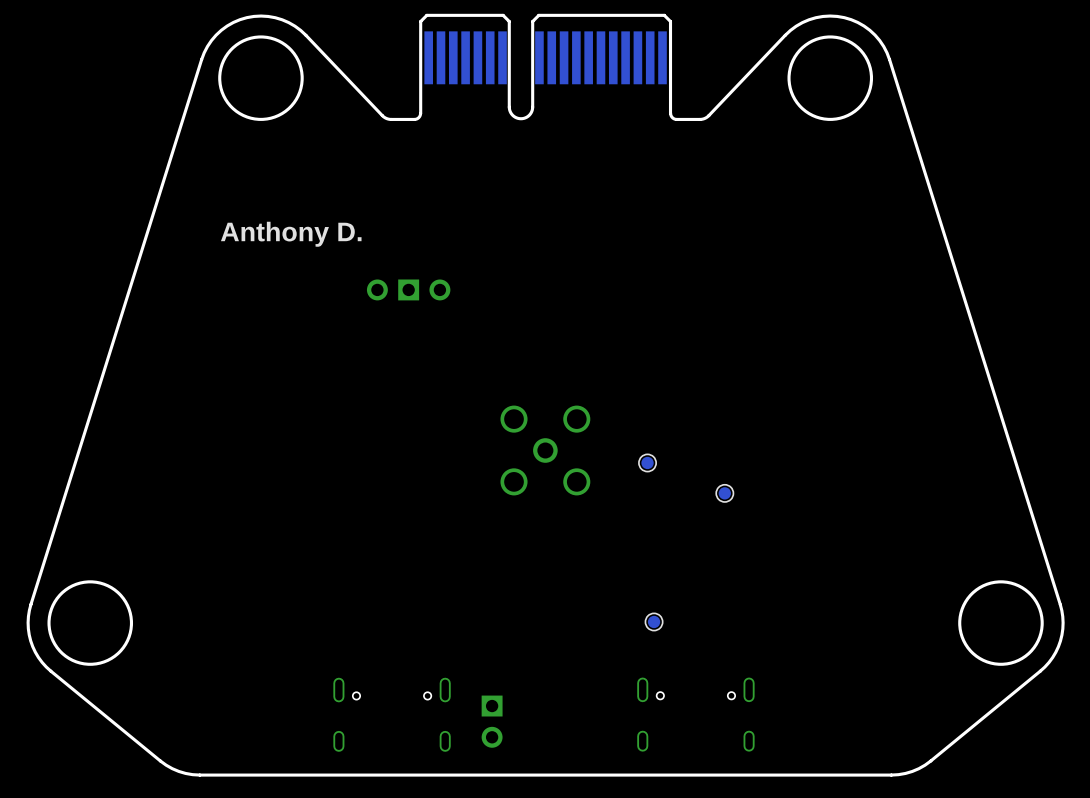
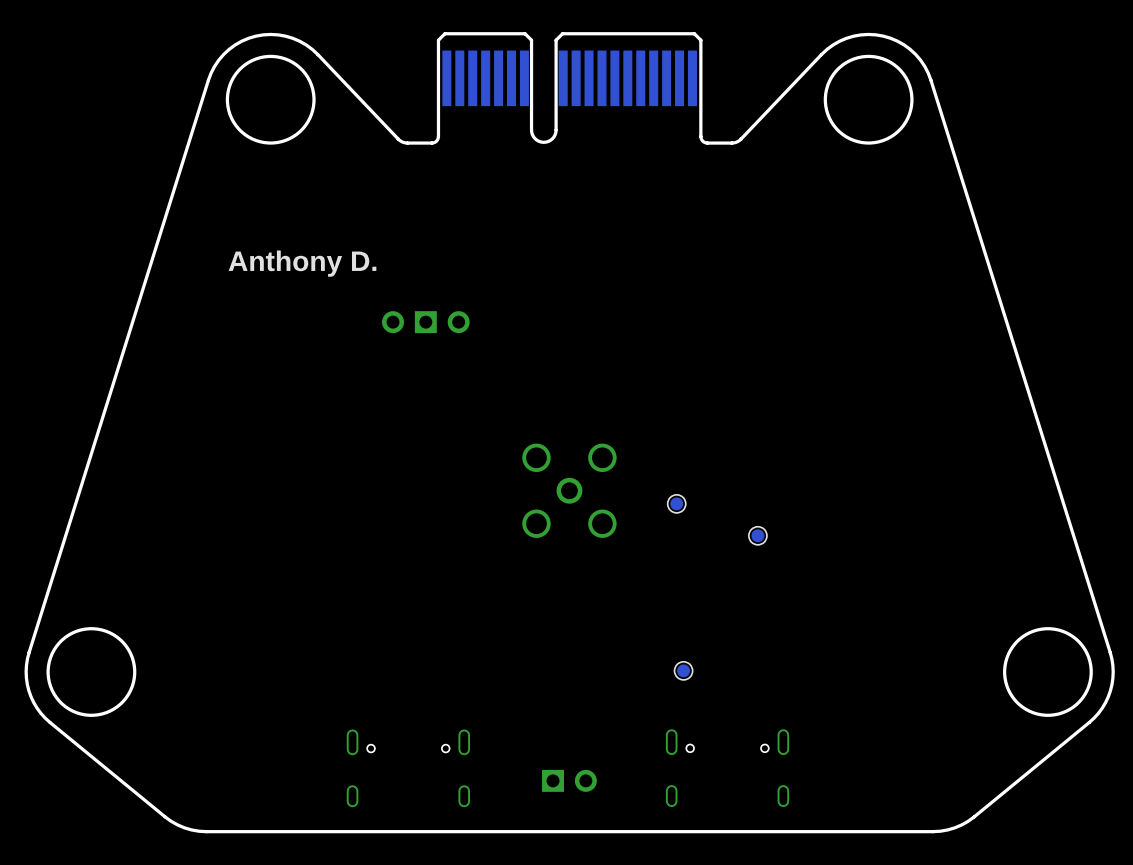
part rotation: 0° (492, 721) -> 90° counterclockwise (569, 780)
part position: (492, 721) -> (569, 780)

